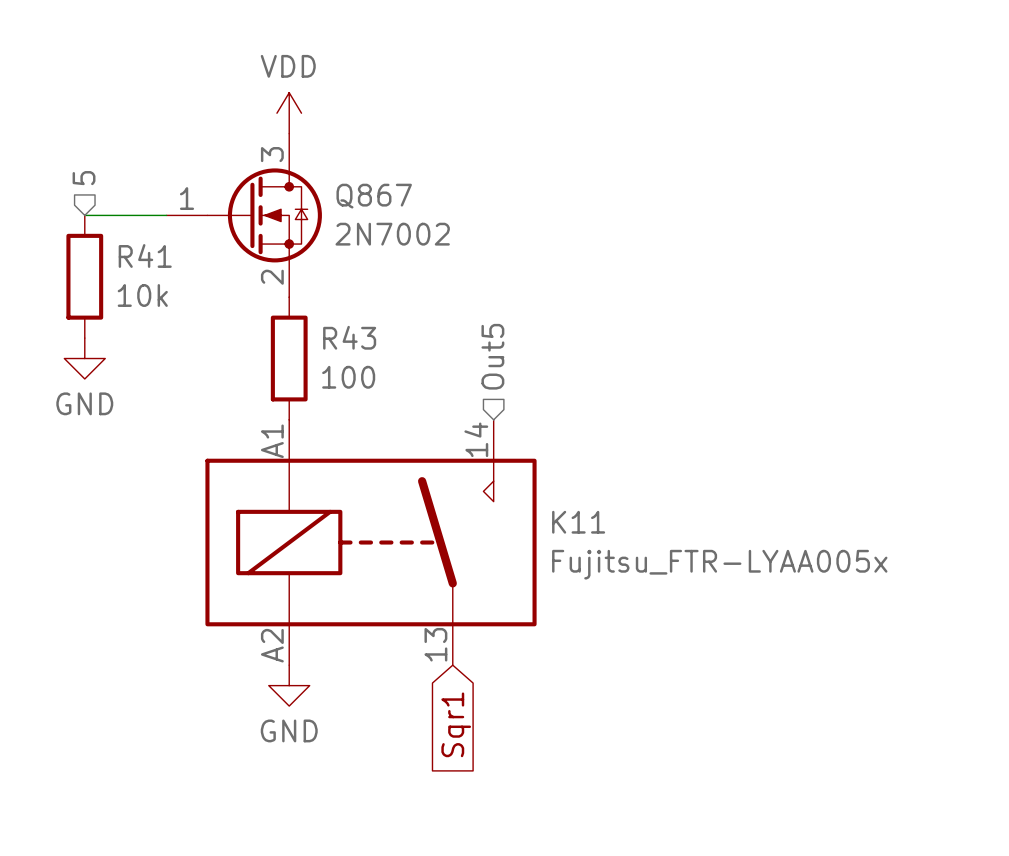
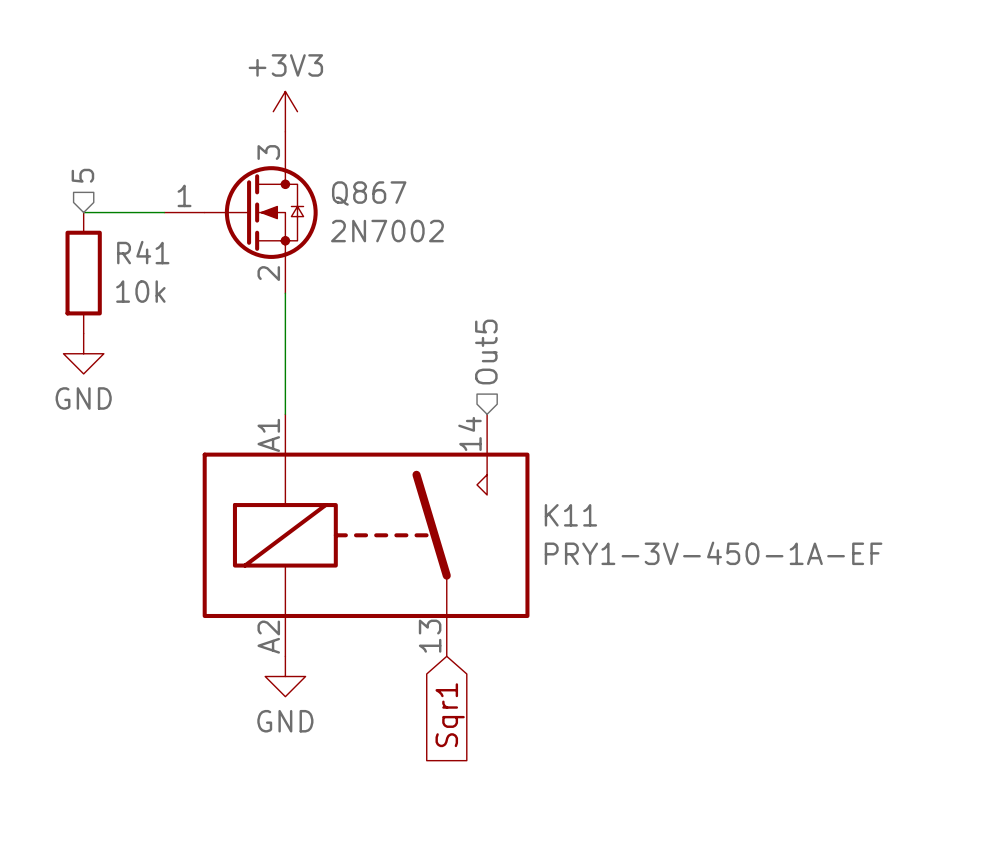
power symbol: VDD (289, 113) -> +3V3 (285, 111)
wire: none -> (285, 293) (285, 414)
R43: 100 (289, 358) -> none
K11 value: Fujitsu_FTR-LYAA005x (719, 564) -> PRY1-3V-450-1A-EF (713, 553)

